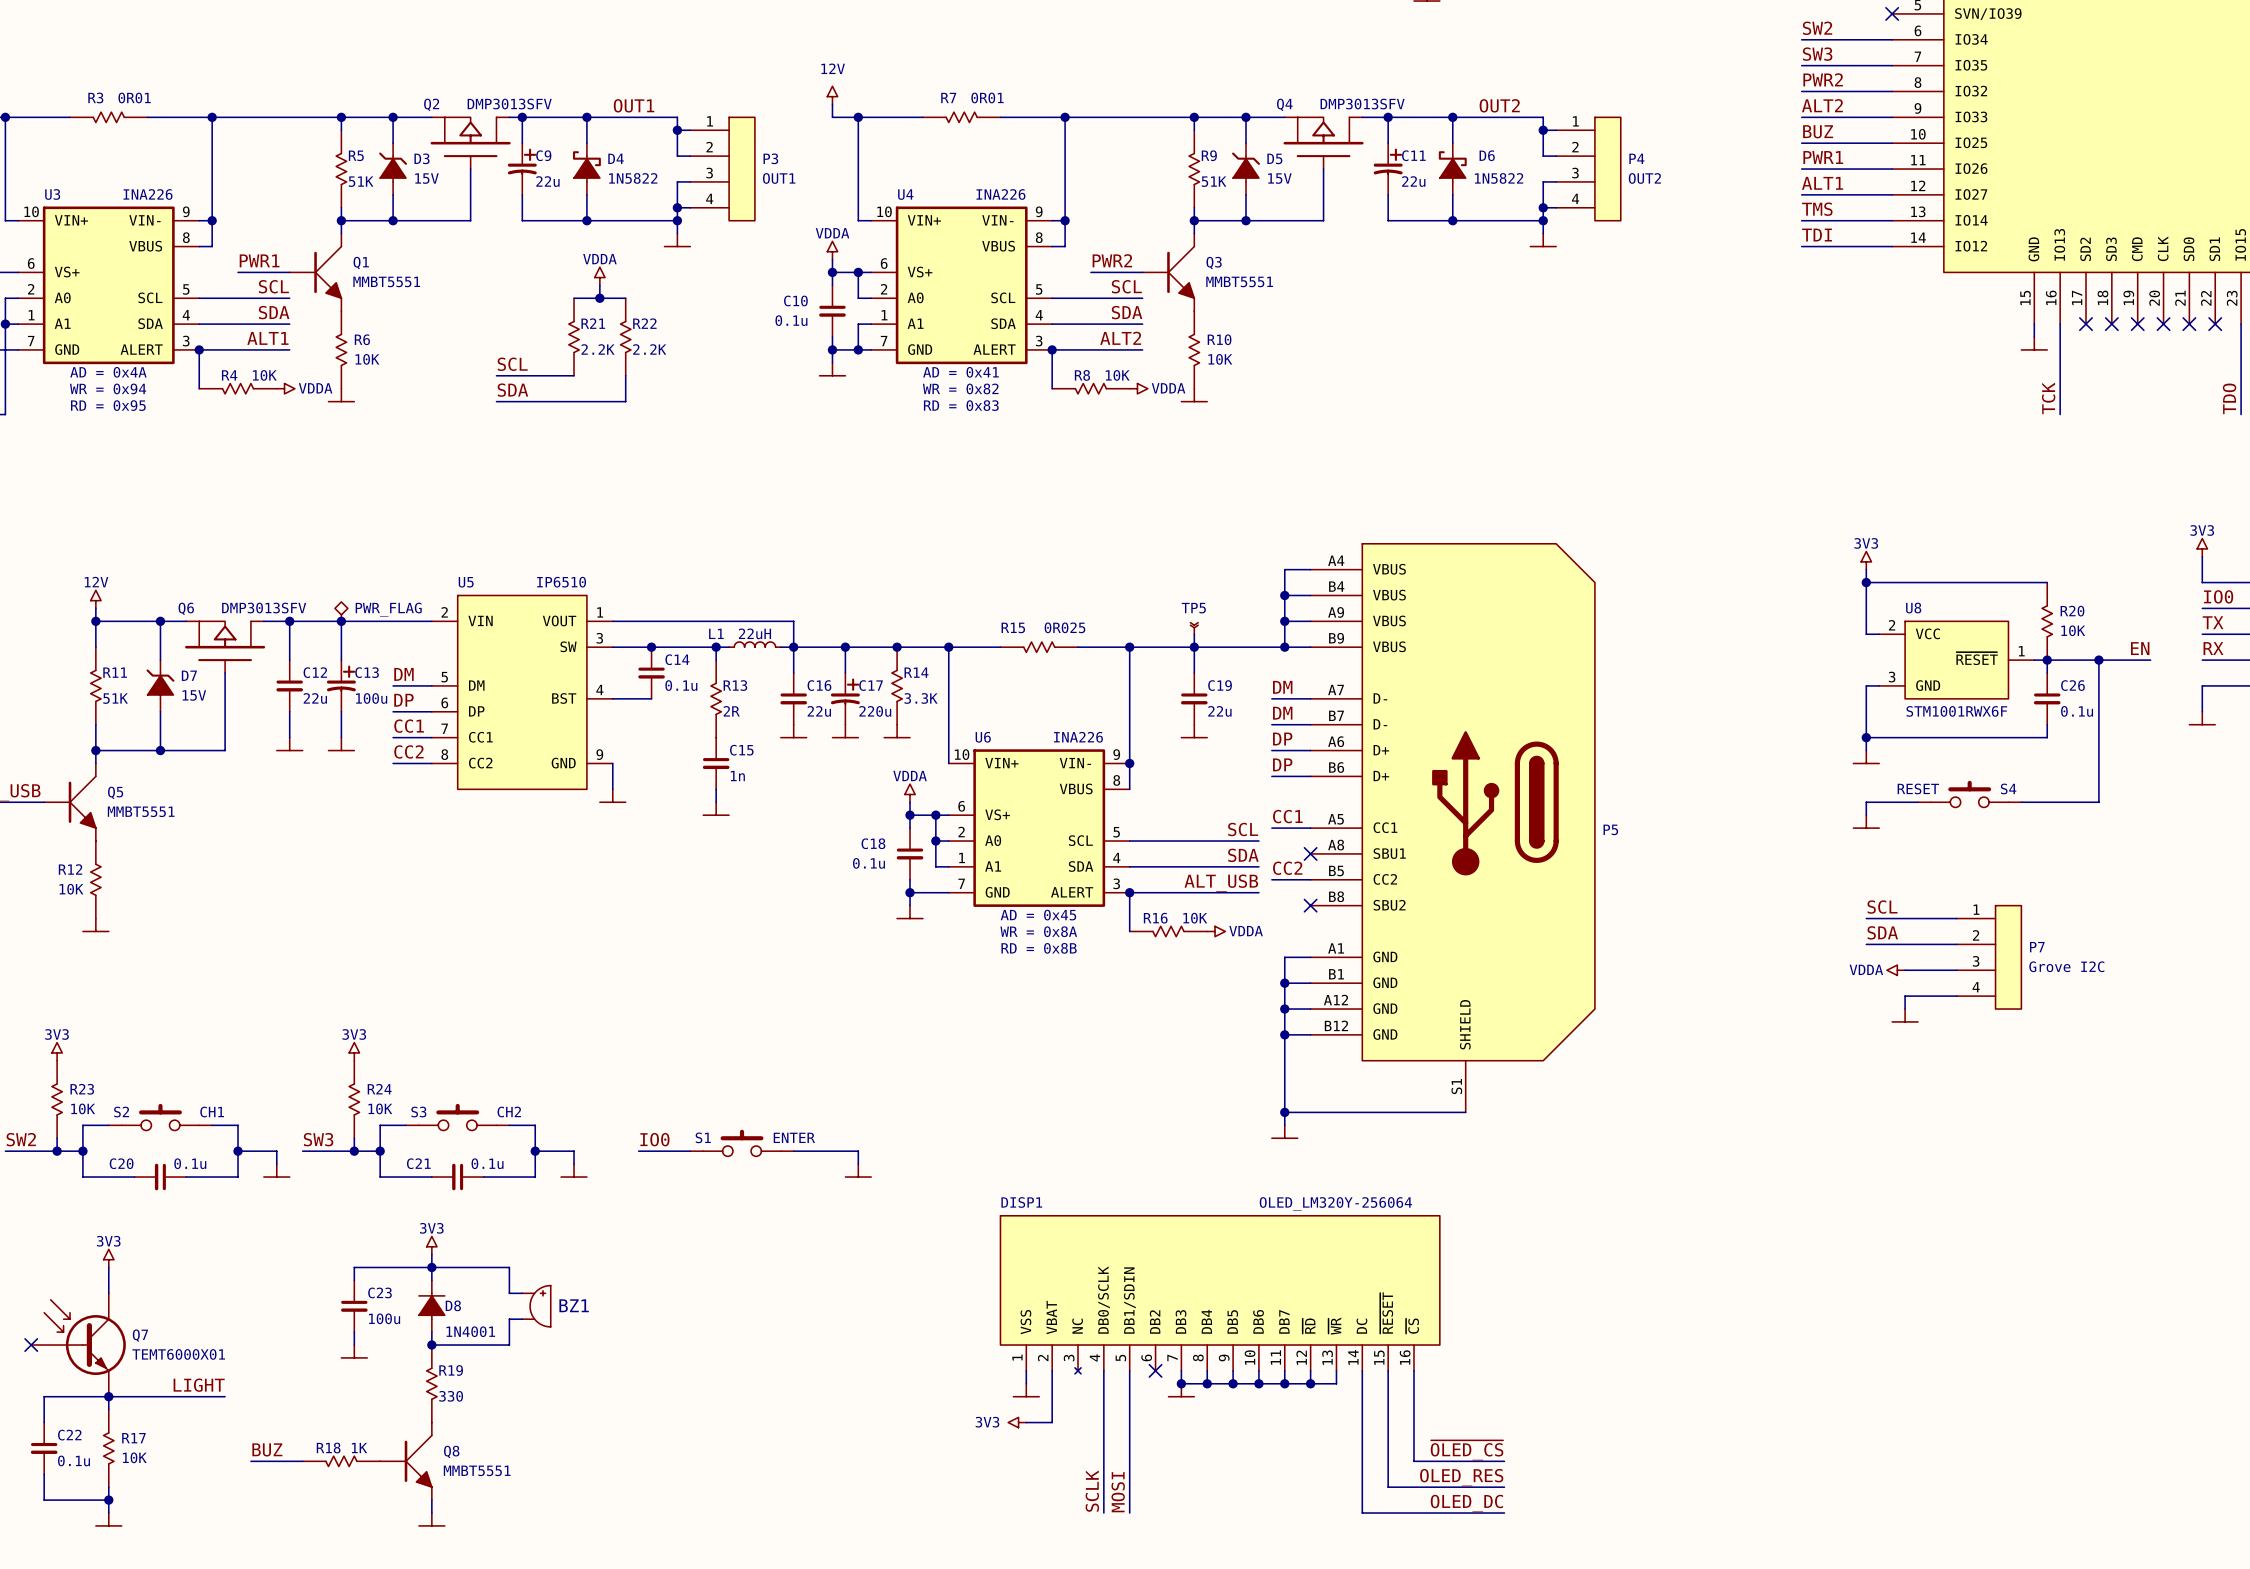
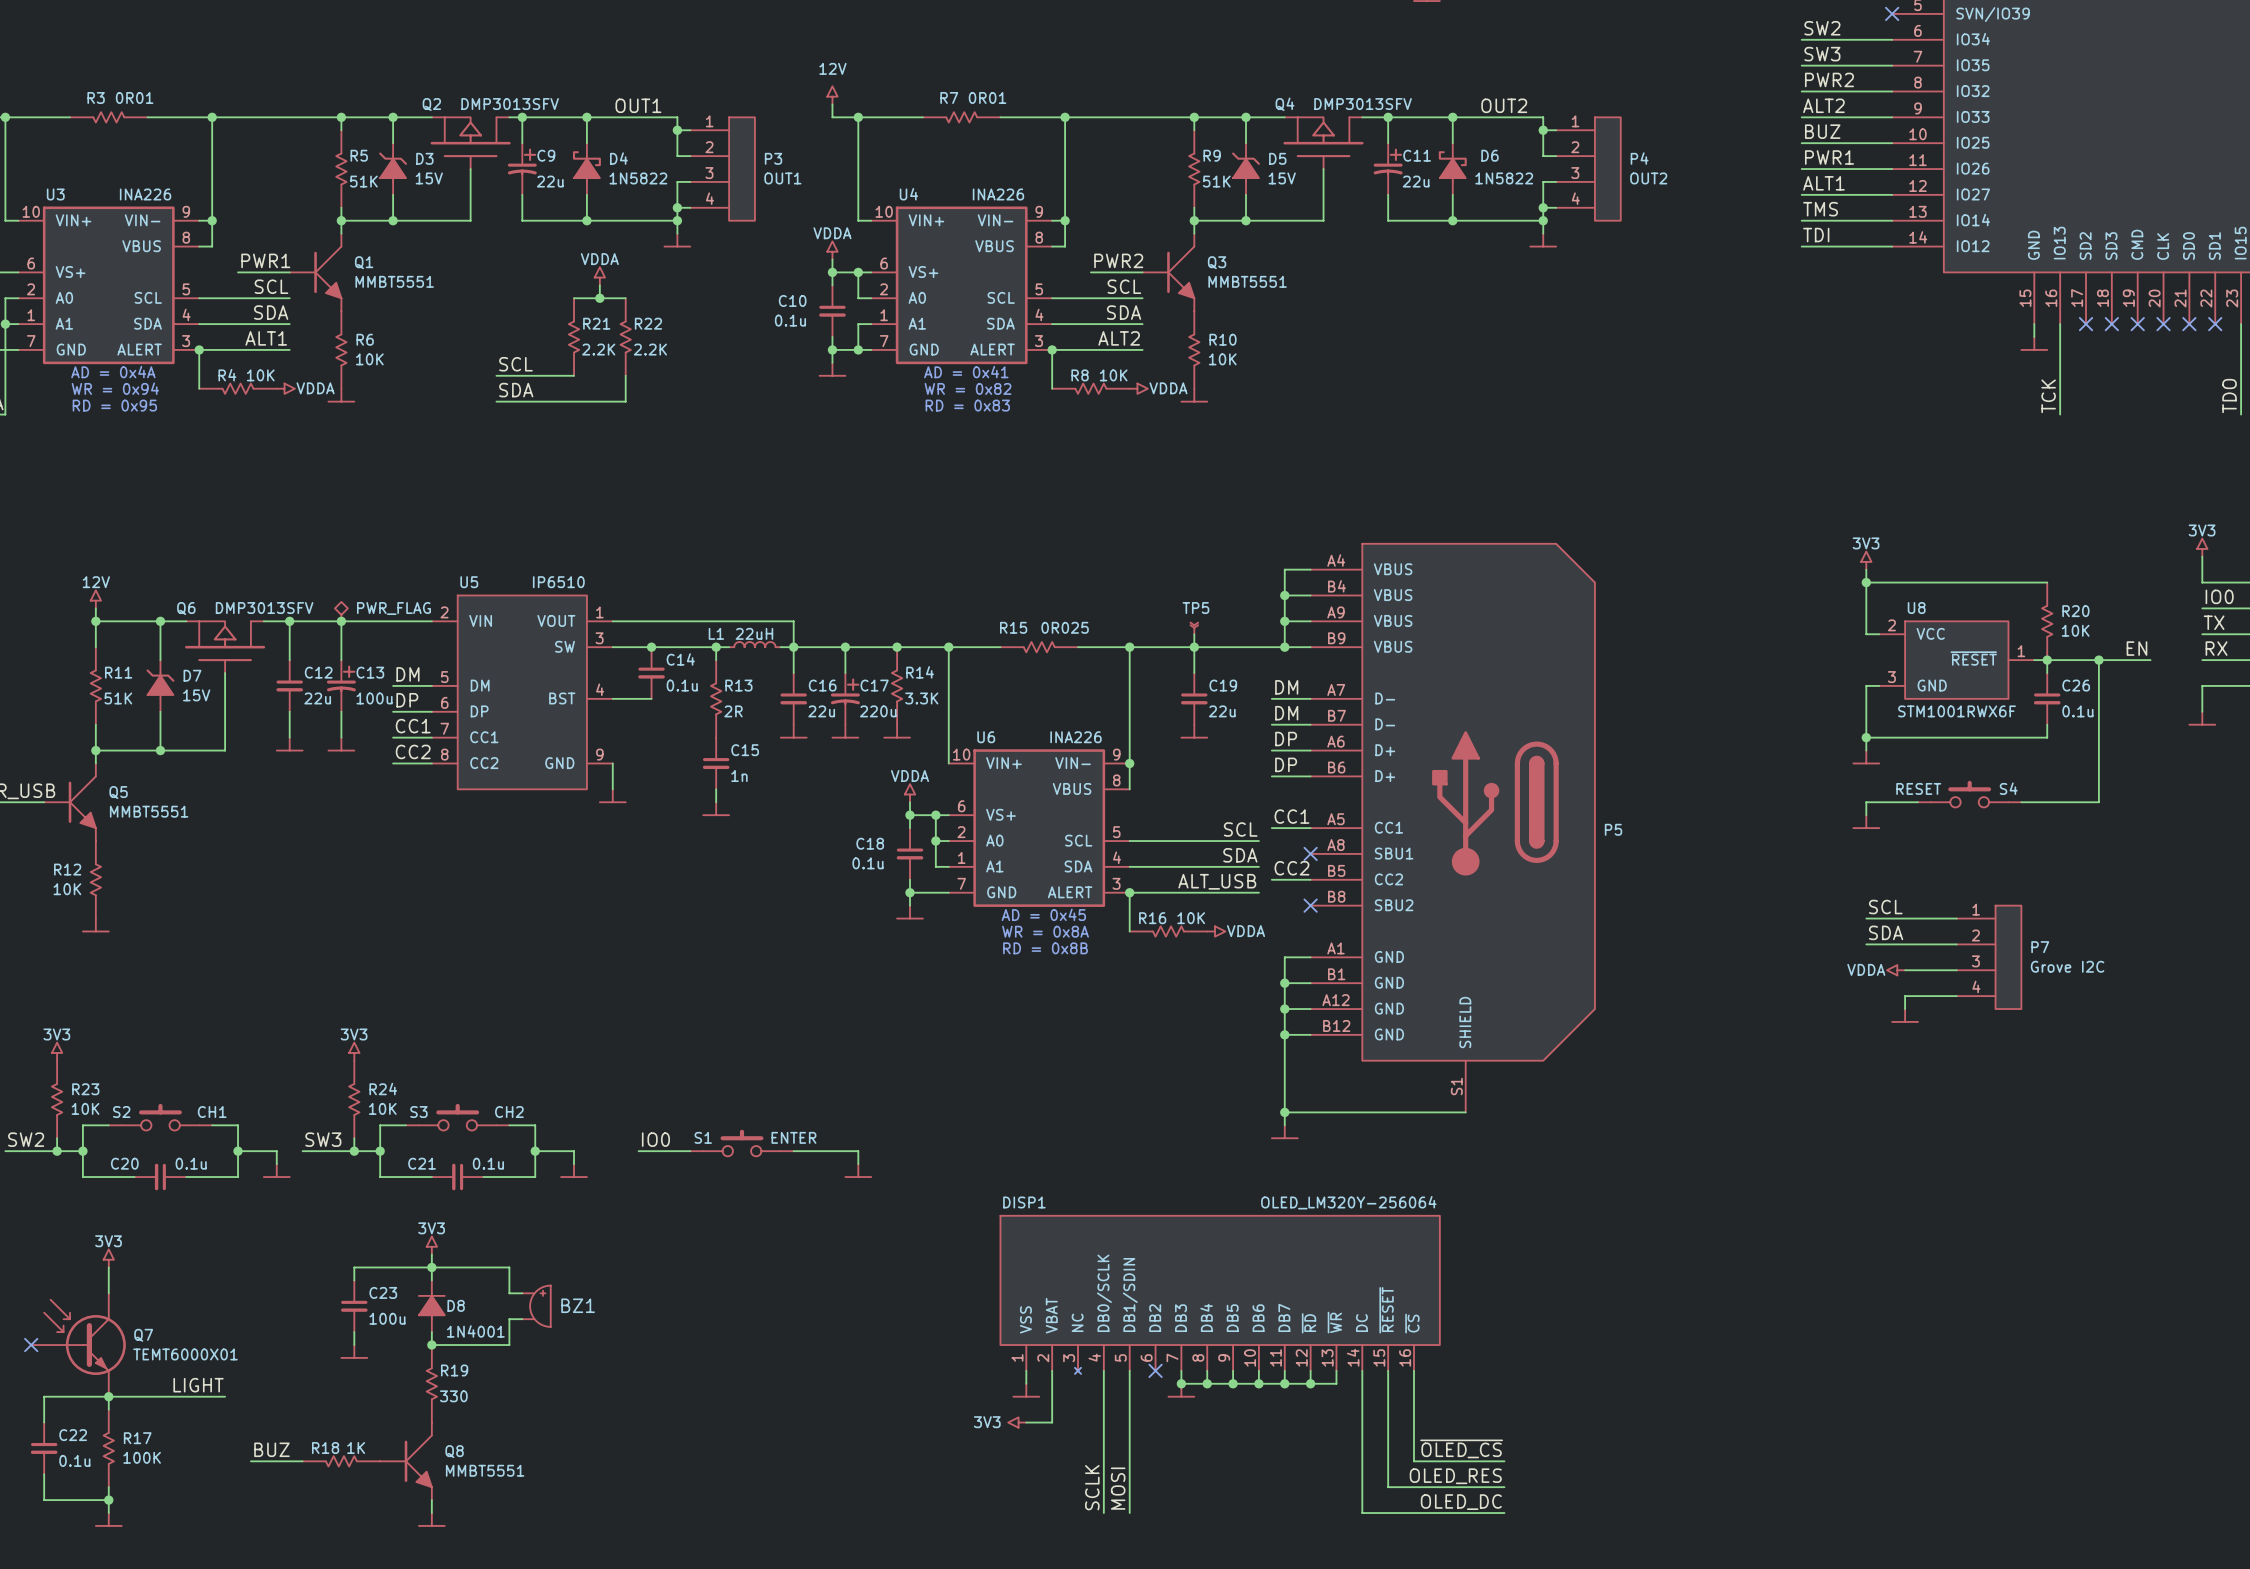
R17 value: 10K (134, 1457) -> 100K (142, 1457)

